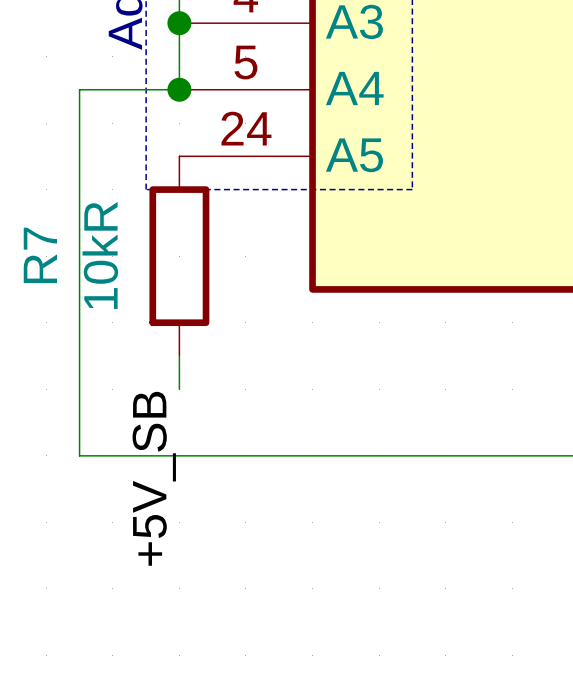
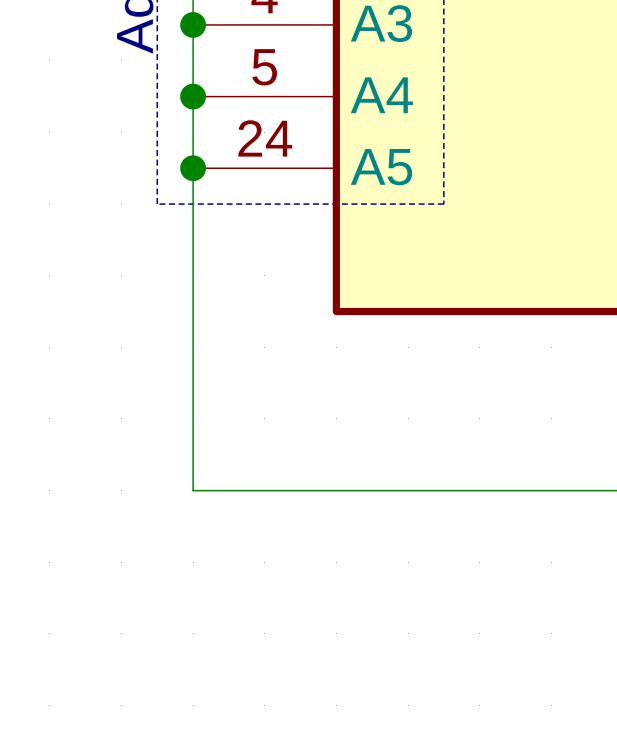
wire: (179, 89) (79, 89) (79, 455) (179, 455) -> (193, 96) (193, 383)
junction: none -> (193, 168)
R7: 10kR (179, 256) -> none
wire: none -> (193, 418) (193, 490)
label: +5V_SB (154, 478) -> none

